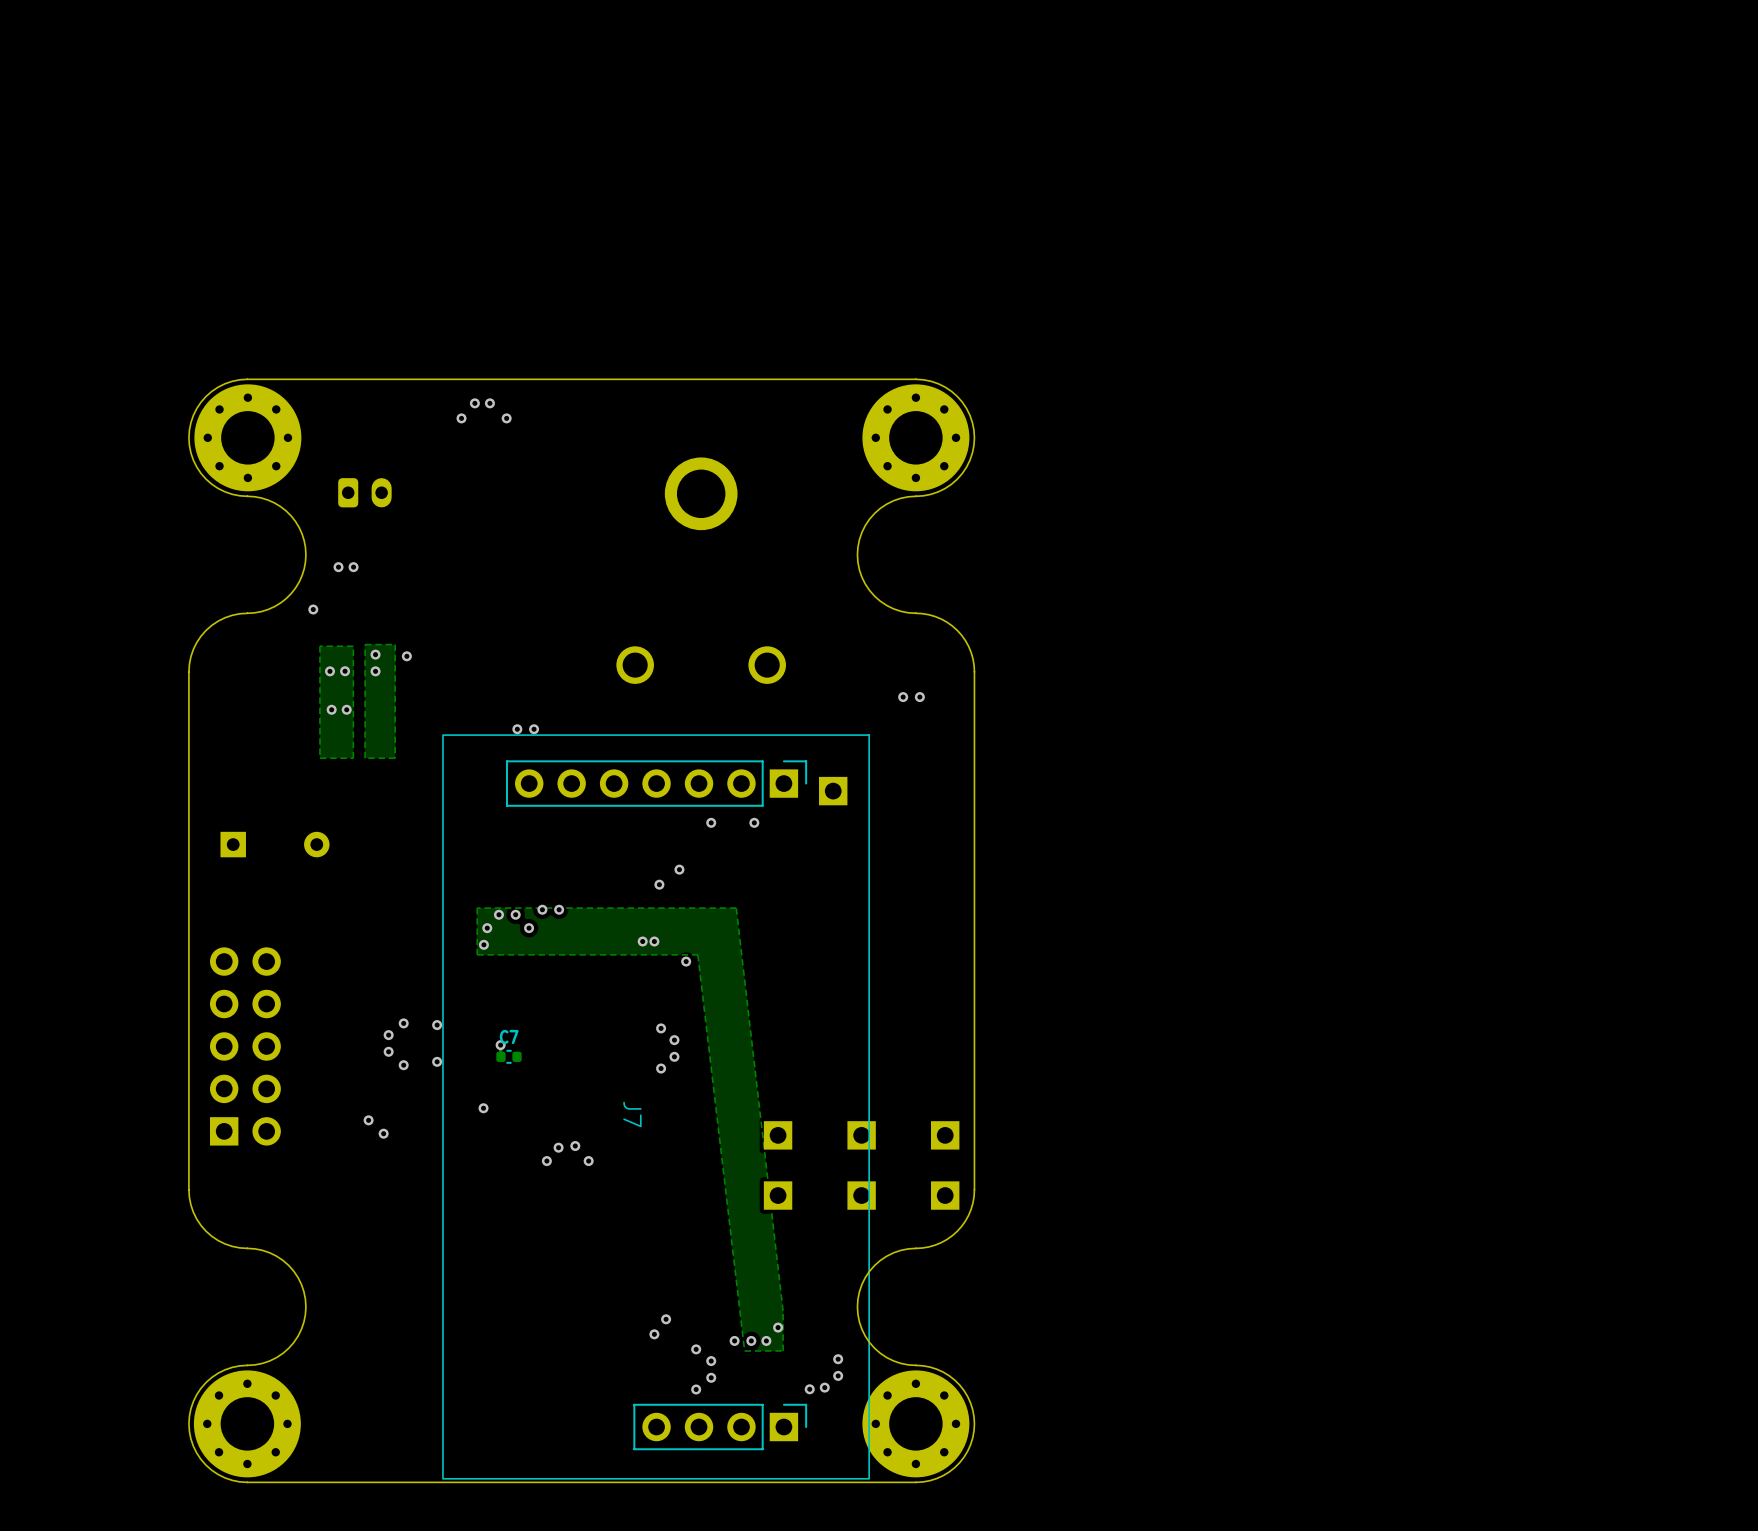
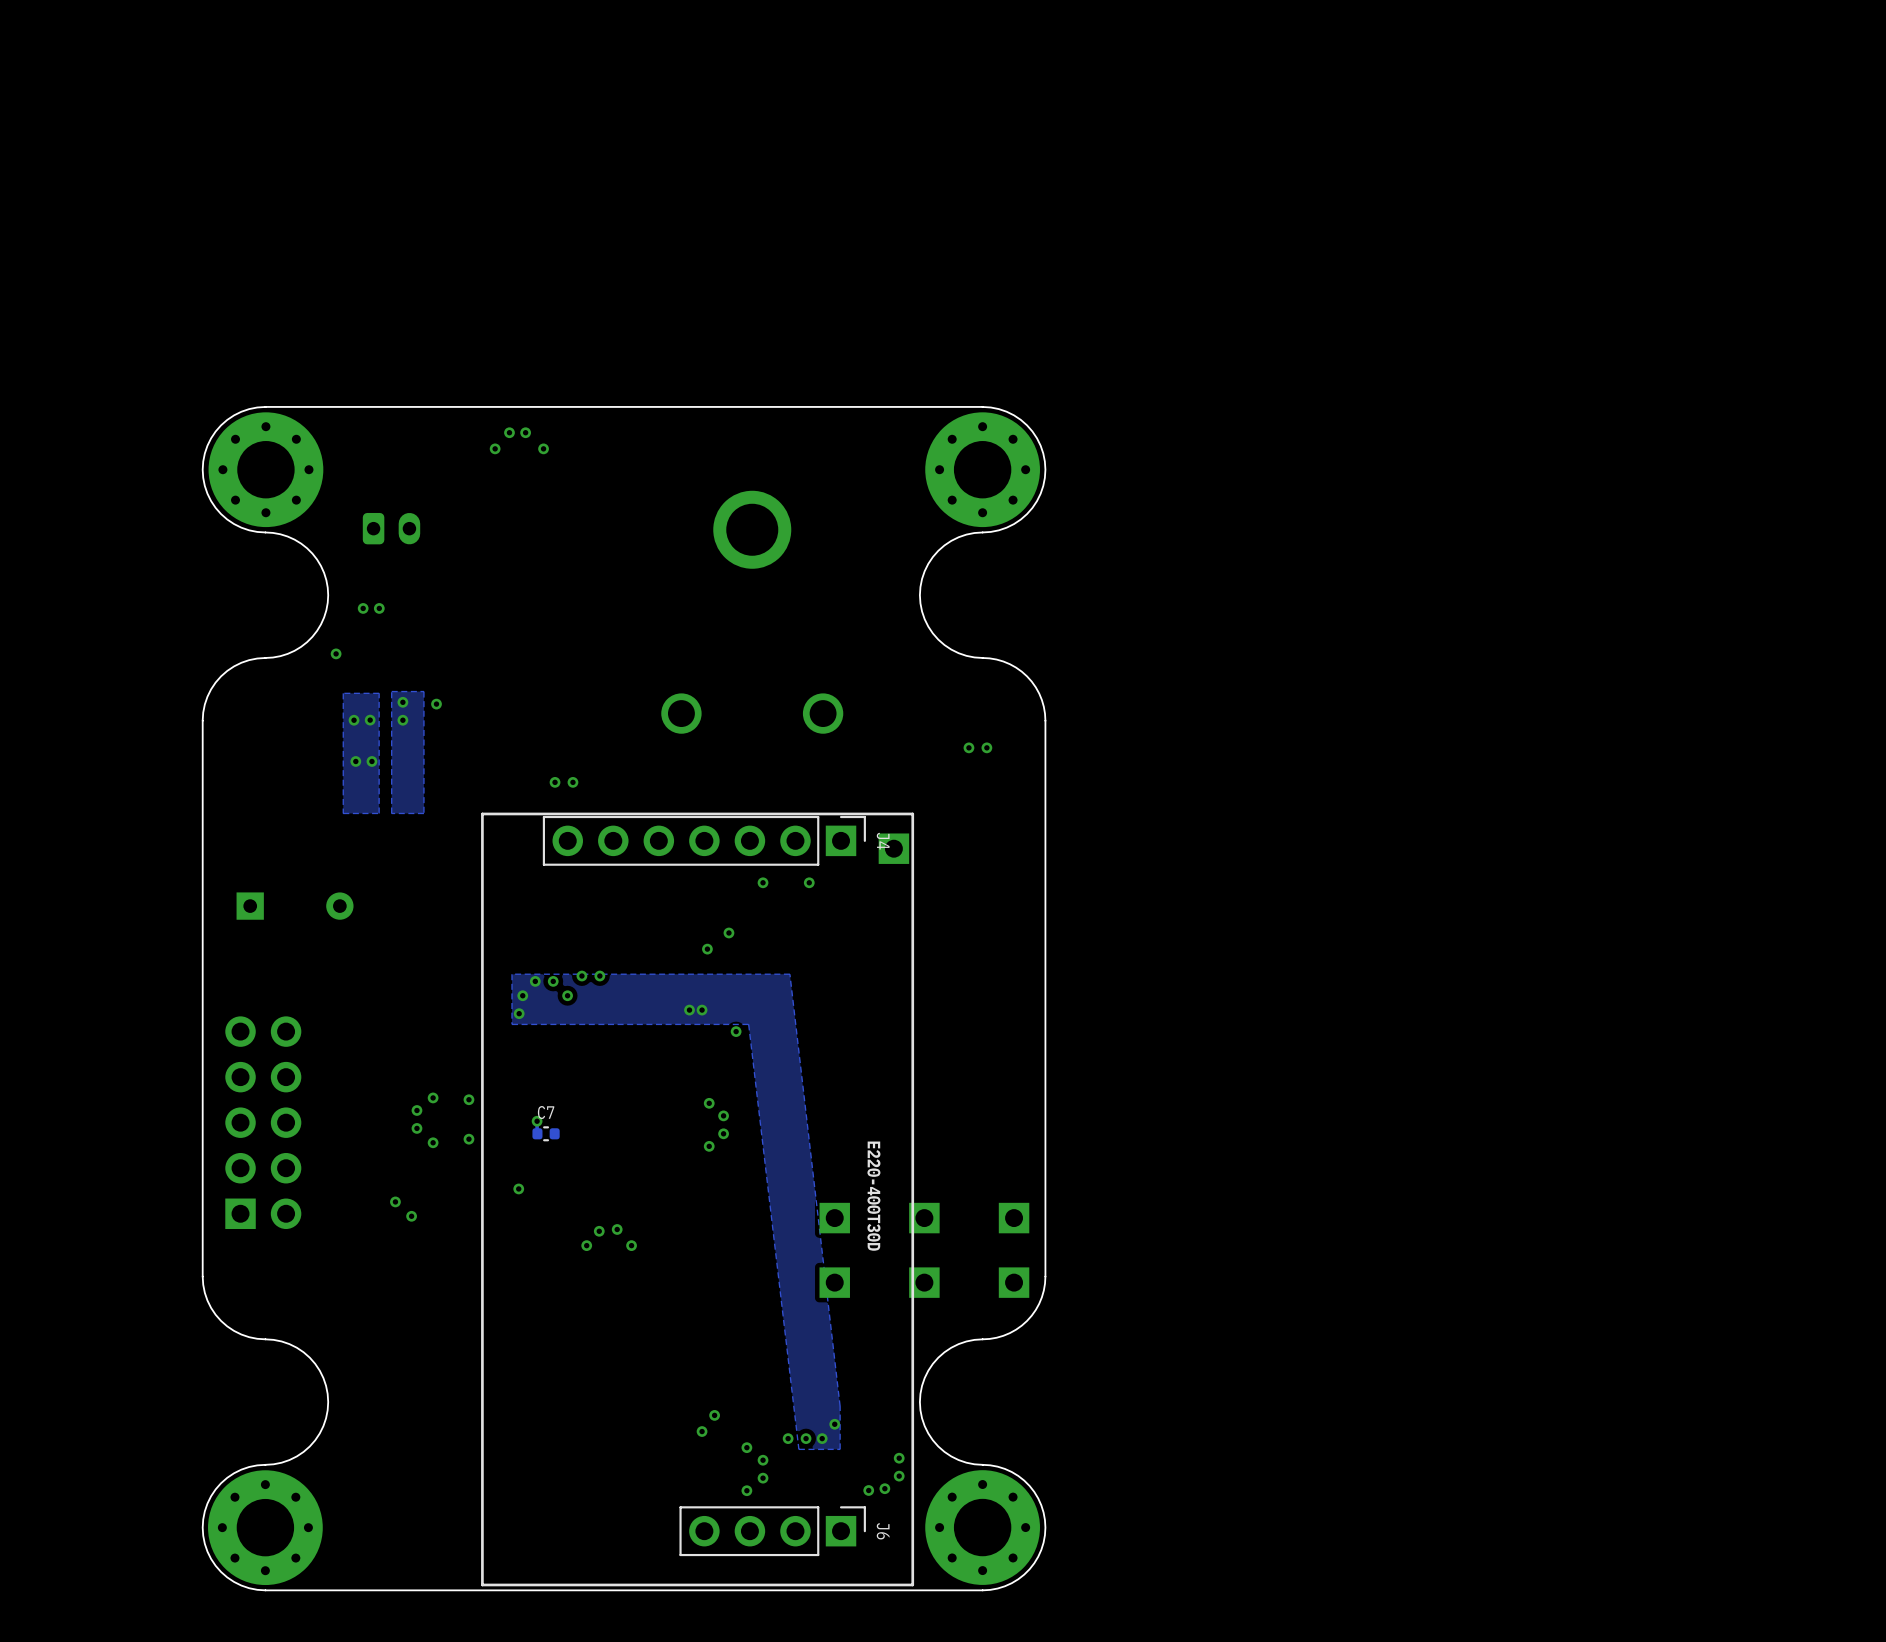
line: none -> (912, 813) (482, 813) (482, 1584) (912, 1584) (912, 813)
J4: none -> (704, 840)
J7: (656, 1106) -> none
text: none -> E220-400T30D (873, 1196)
J6: none -> (772, 1531)

